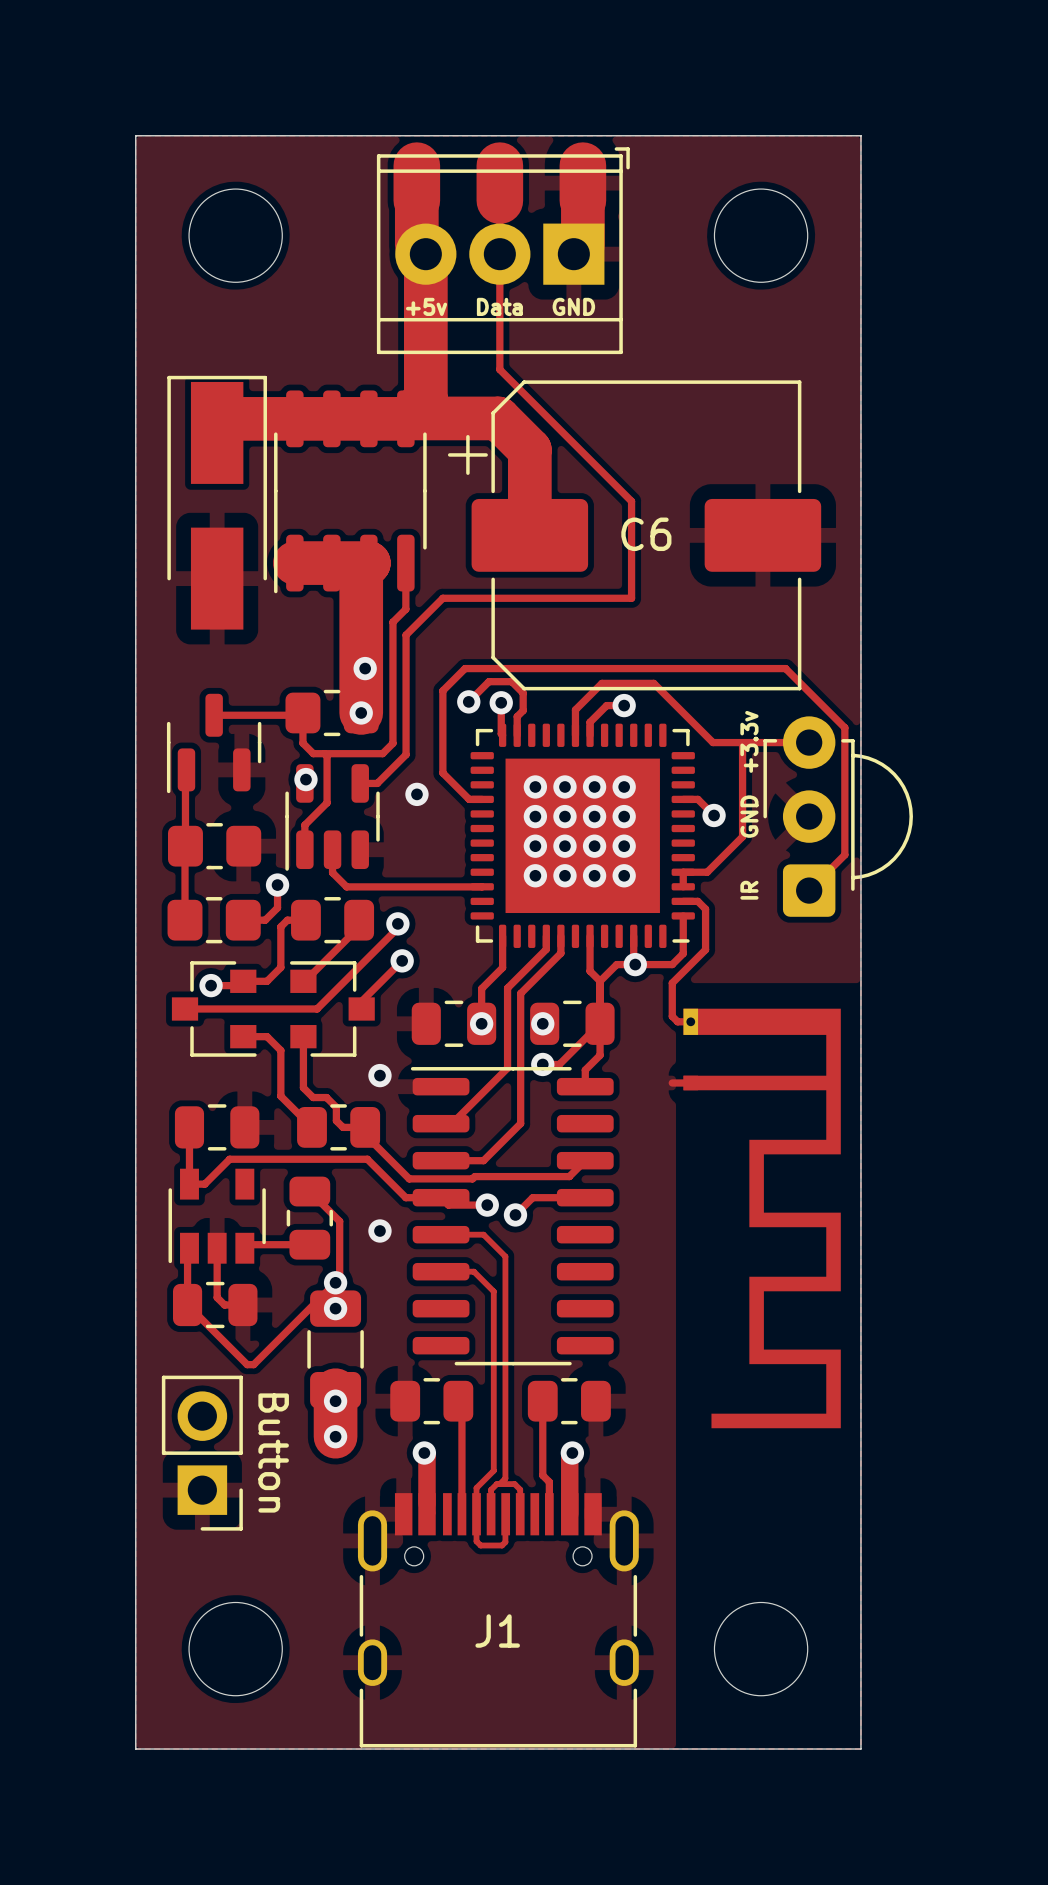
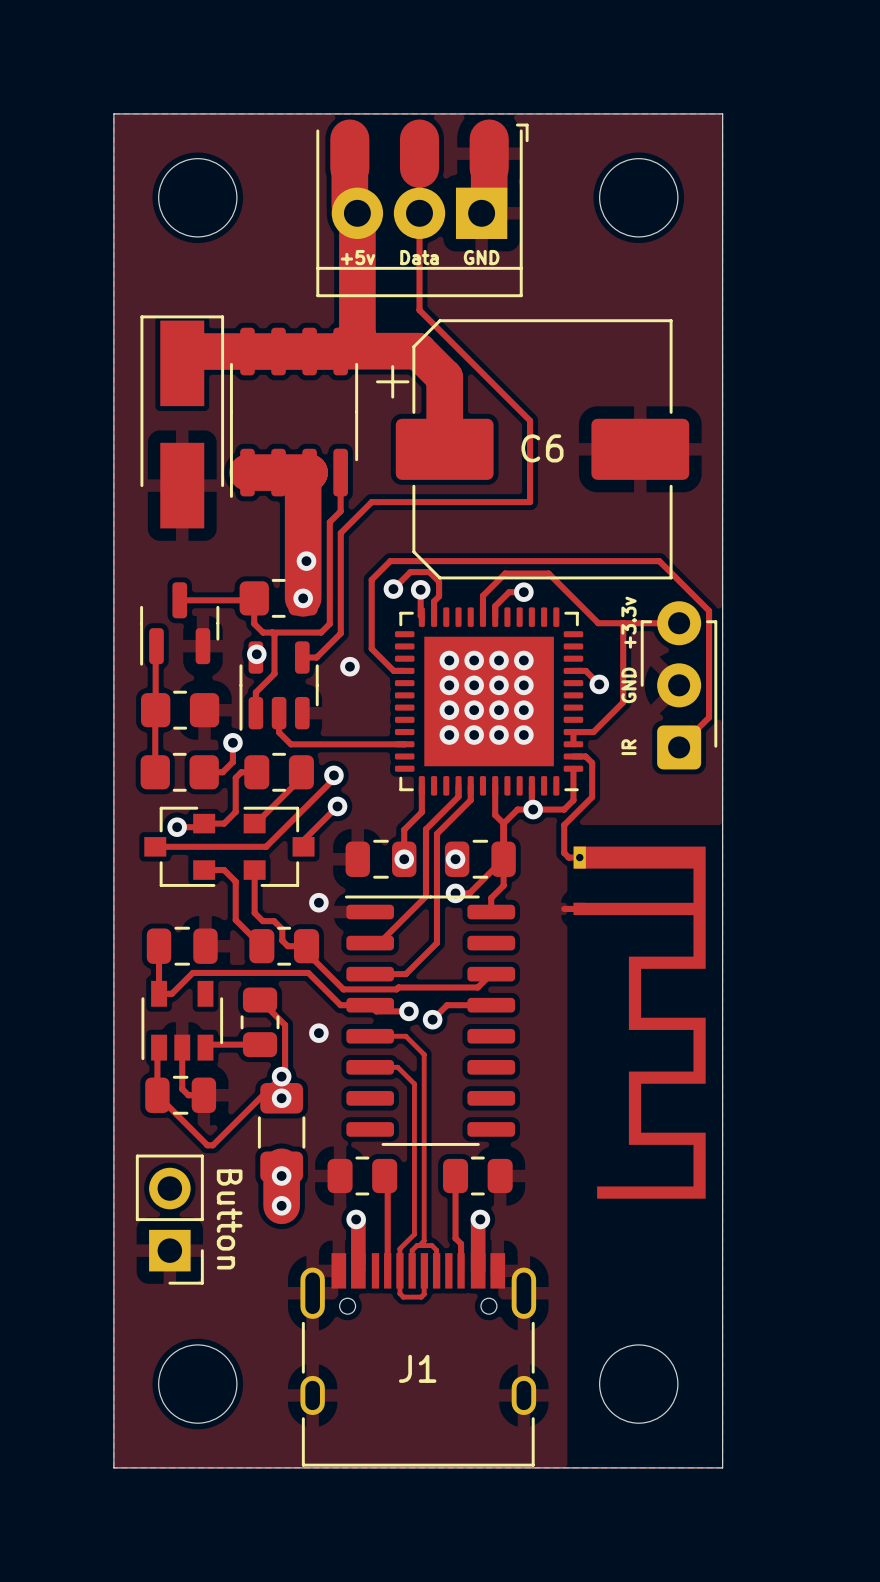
part footprint: [376, 147, 630, 355] -> [316, 123, 529, 298]
part: none -> (679, 685)
part: (838, 816) -> none

